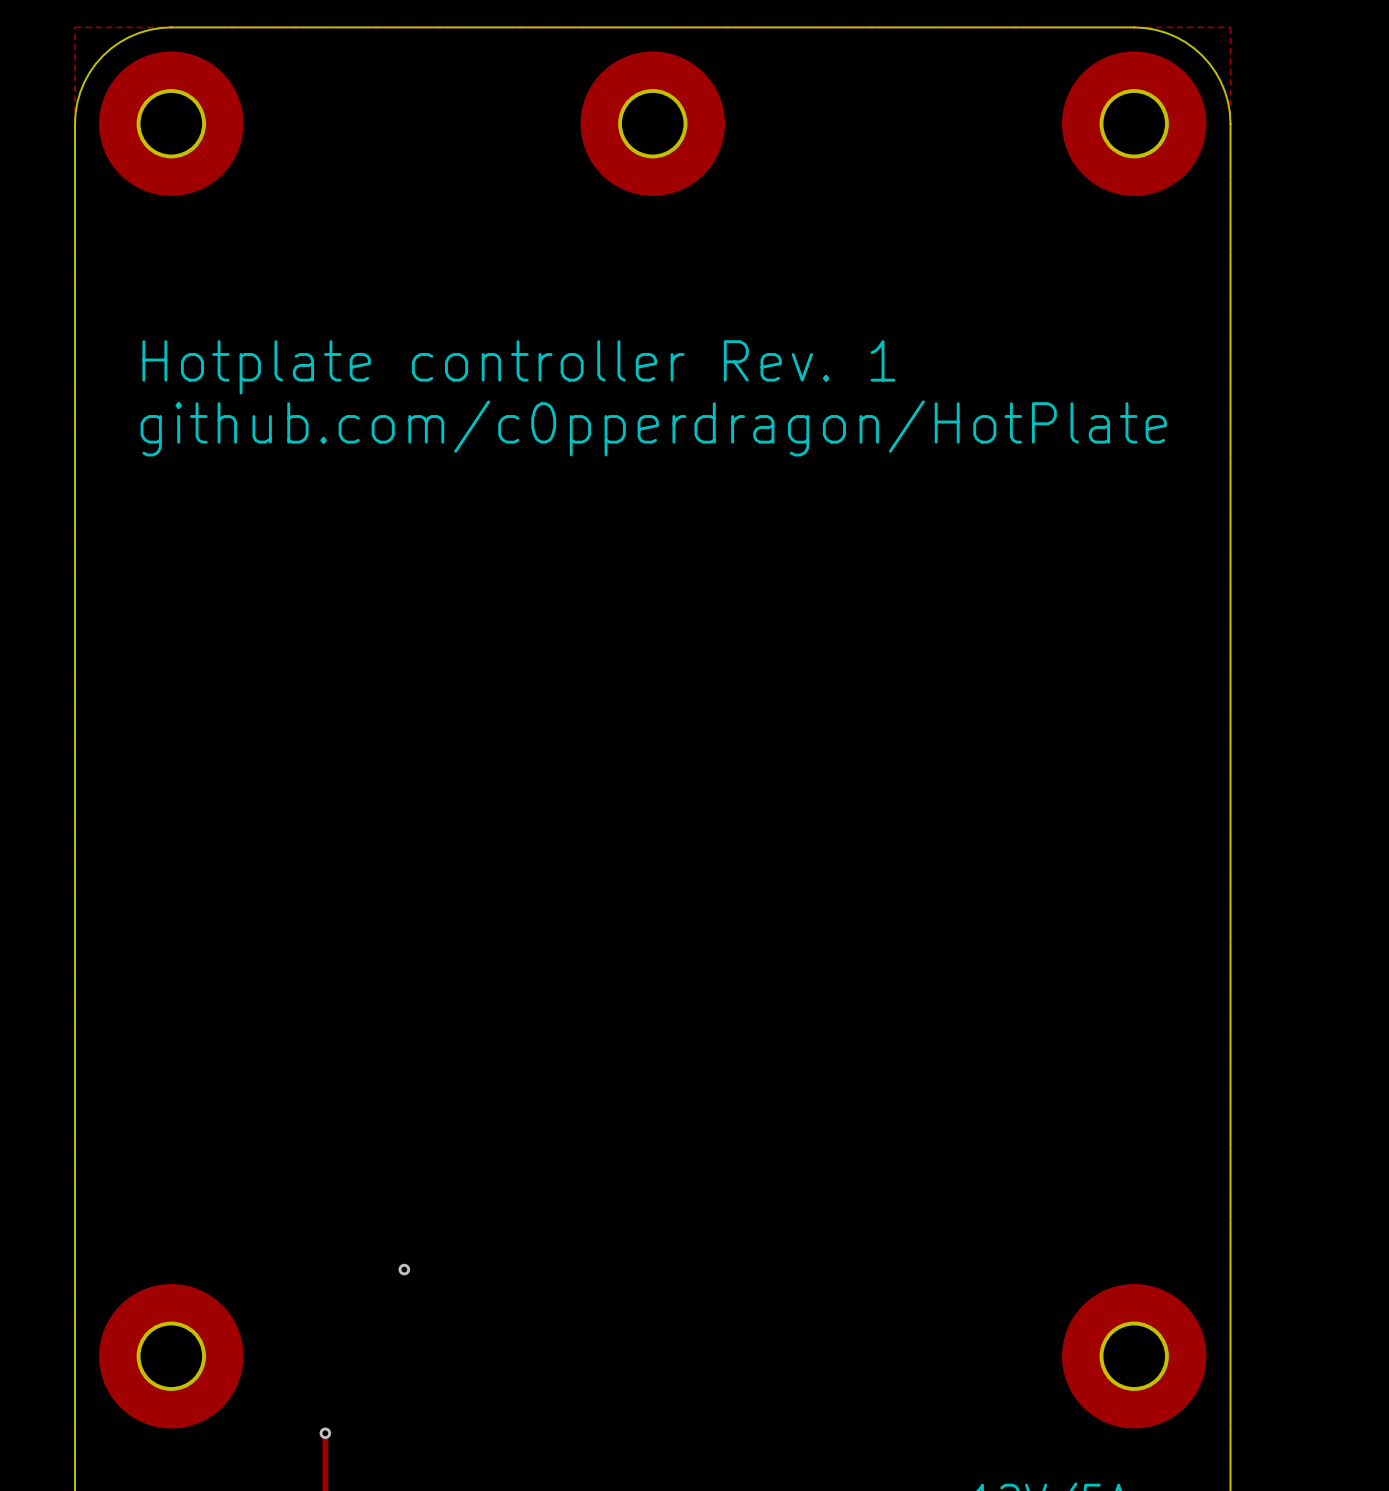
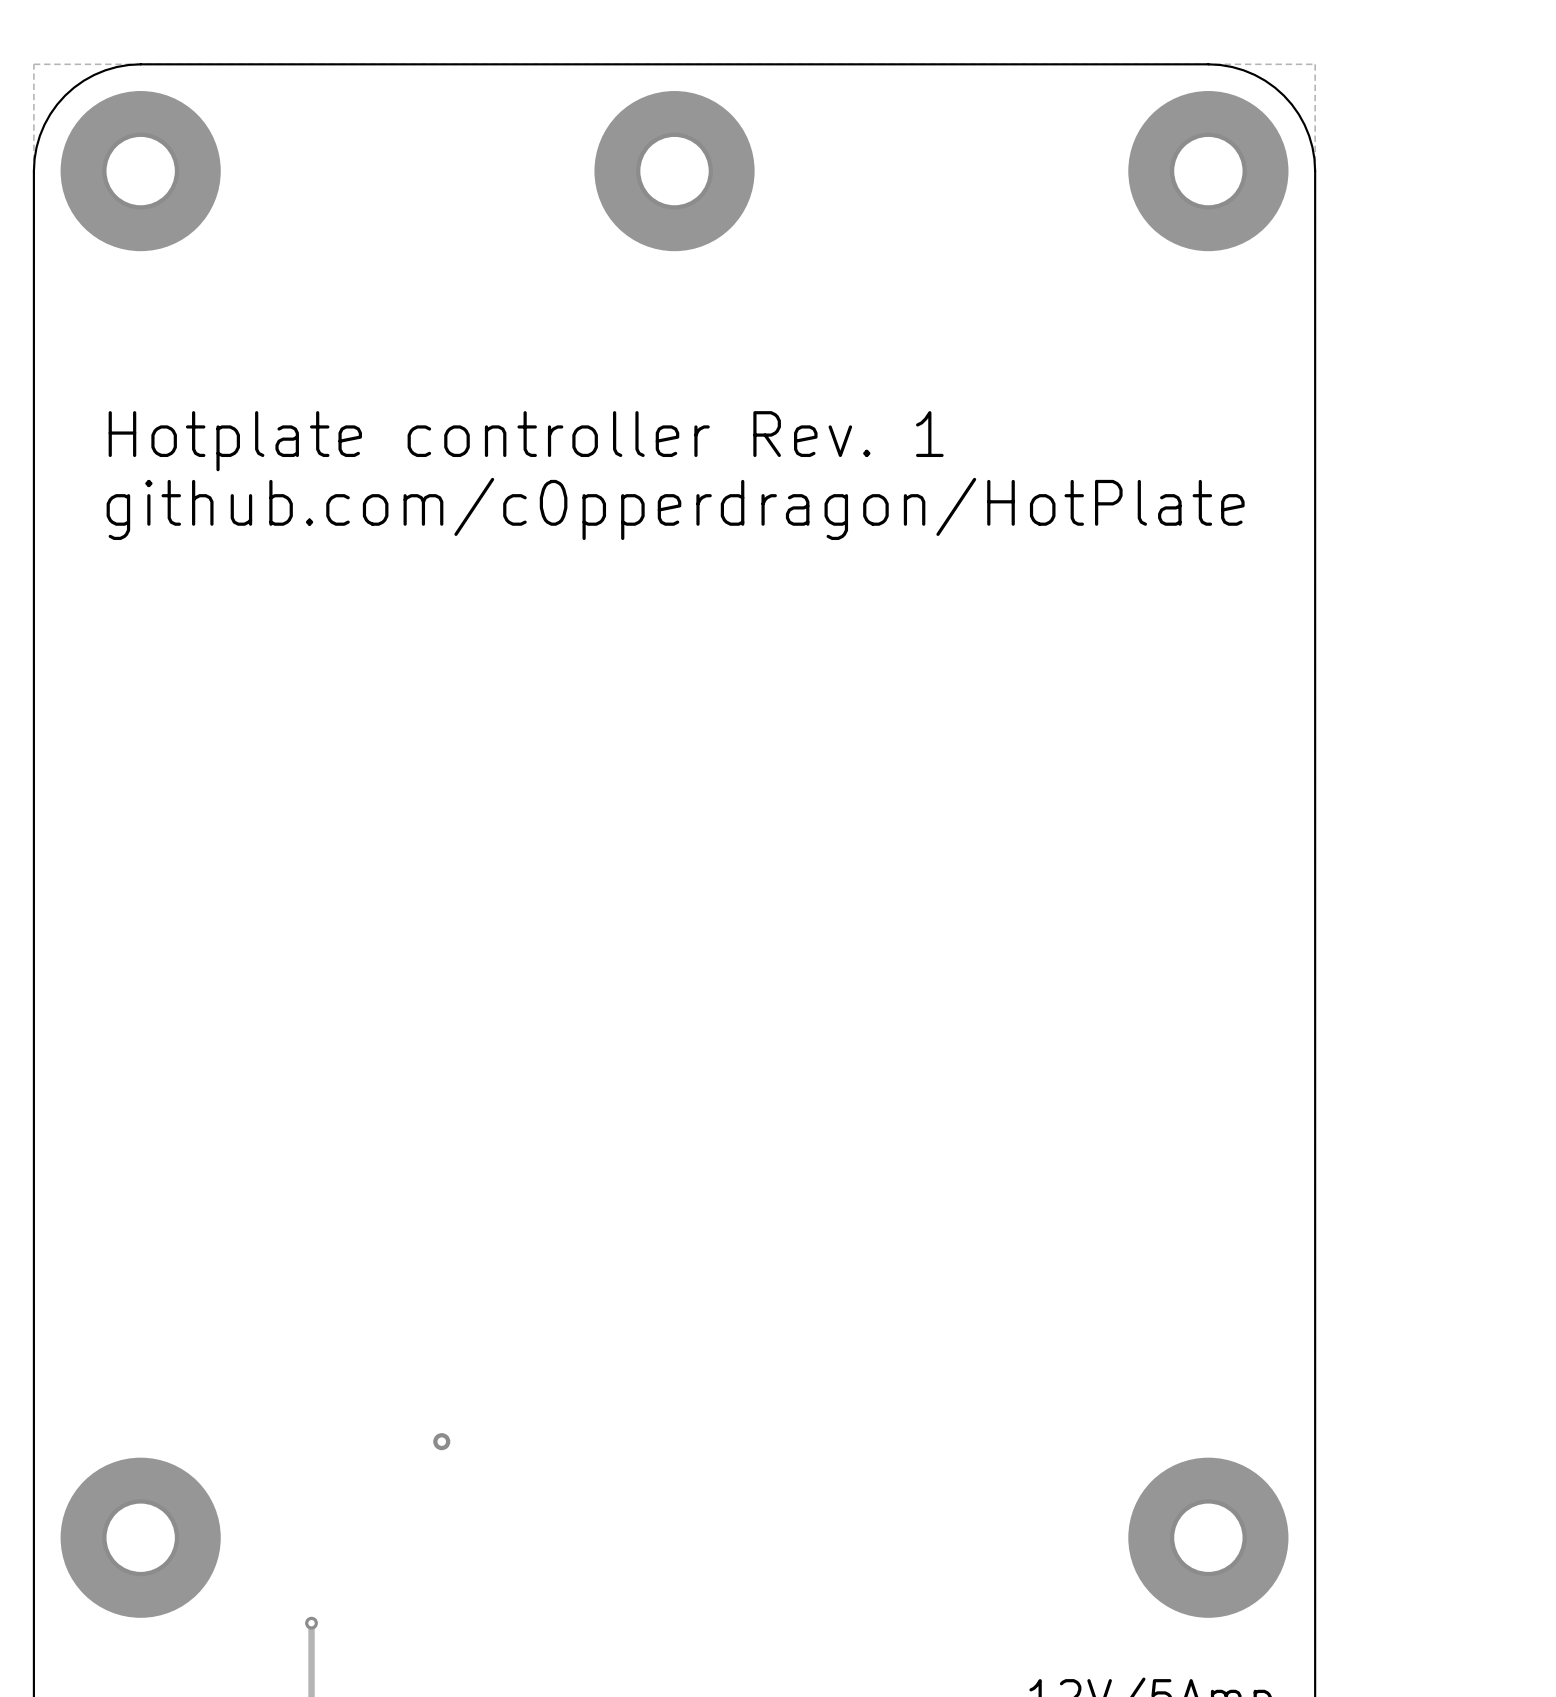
via: (404, 1269) -> none
via: none -> (441, 1441)

